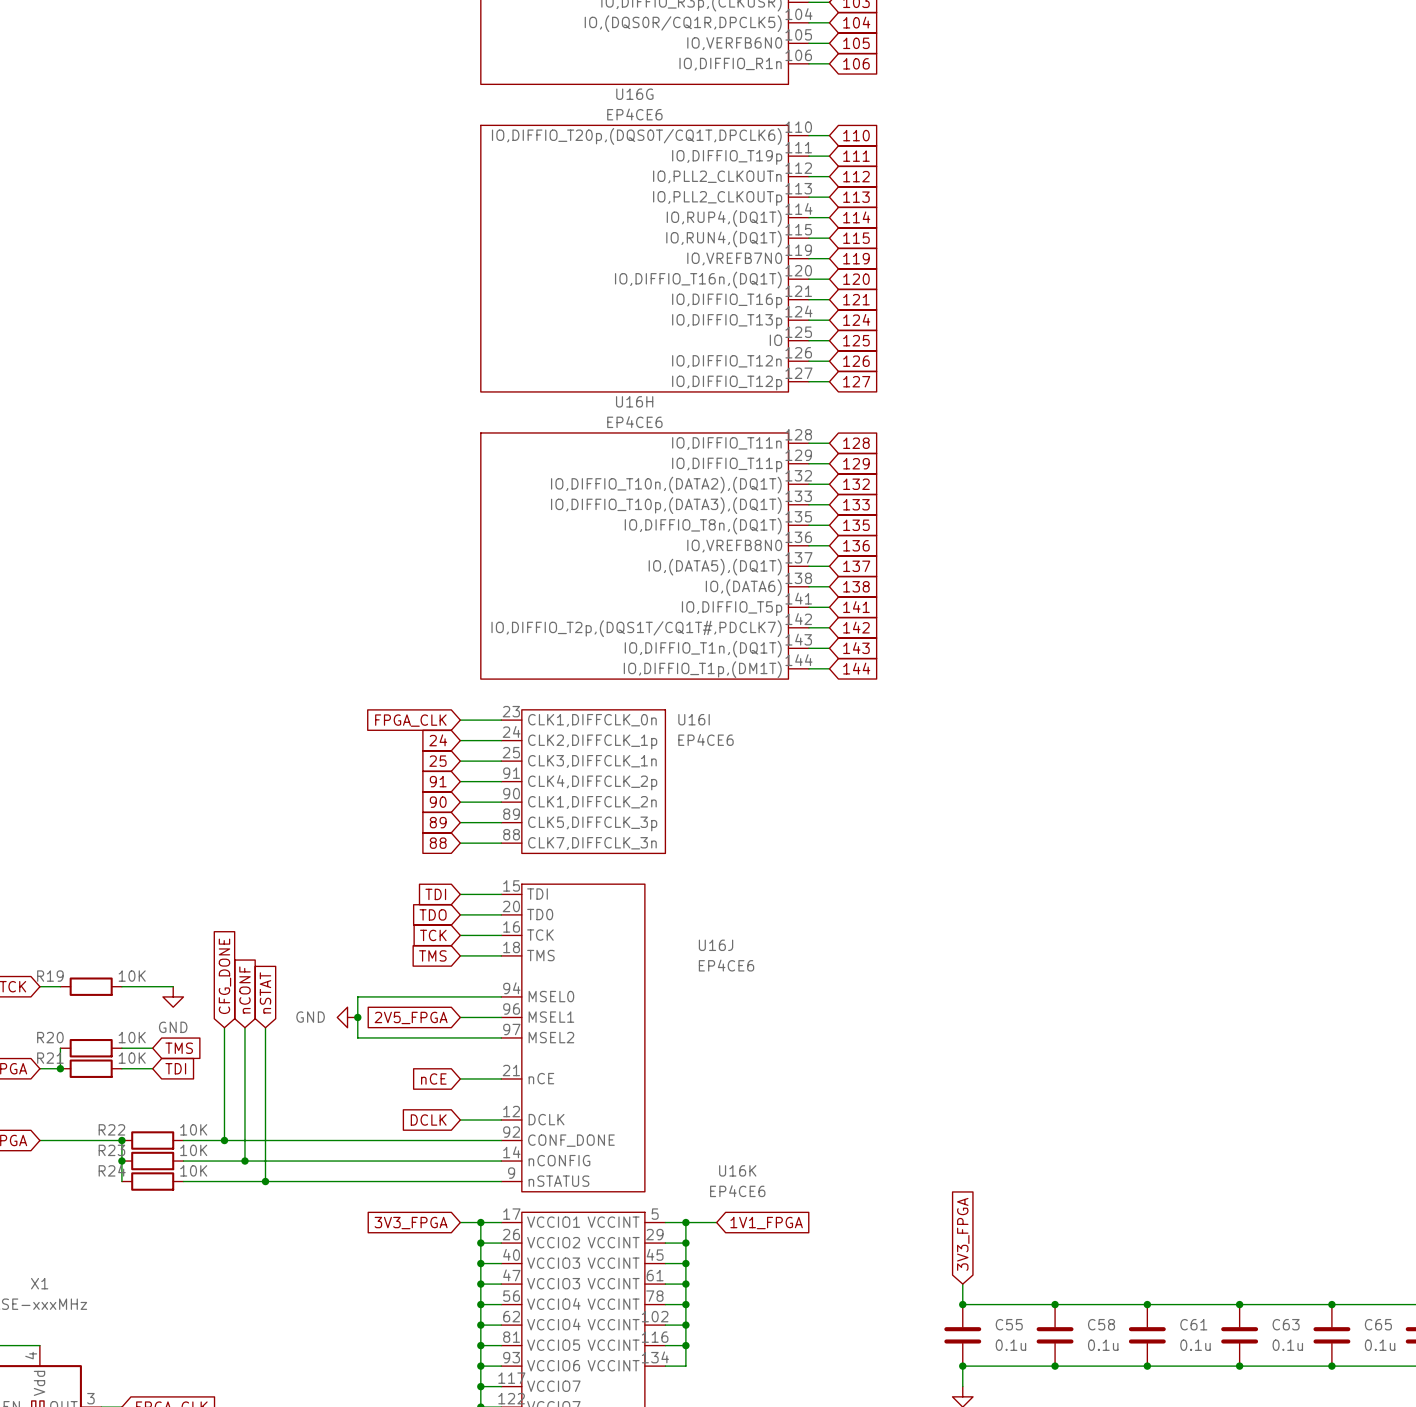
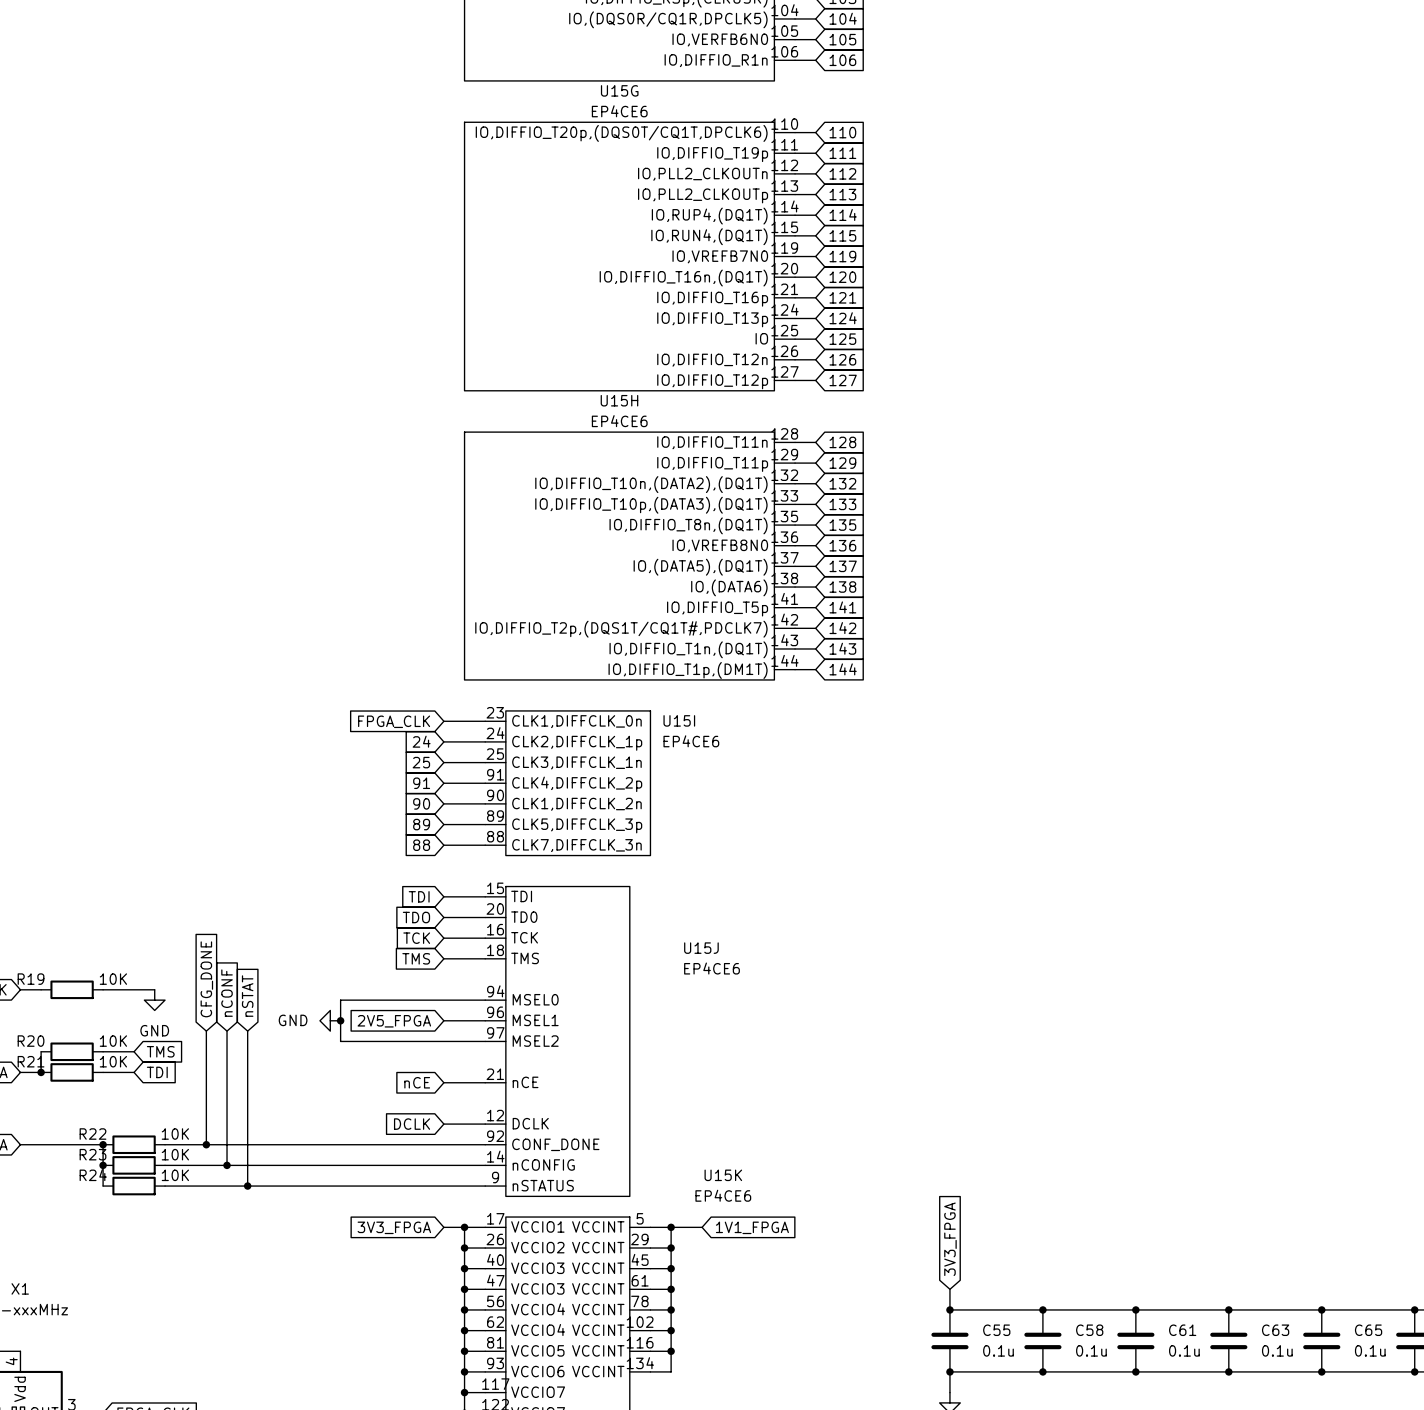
U16G name: U16G (634, 94) -> U15G (619, 90)
U16H name: U16H (634, 401) -> U15H (619, 400)
U16I name: U16I (694, 719) -> U15I (679, 720)
U16J name: U16J (716, 945) -> U15J (701, 948)
U16K name: U16K (737, 1170) -> U15K (723, 1175)

